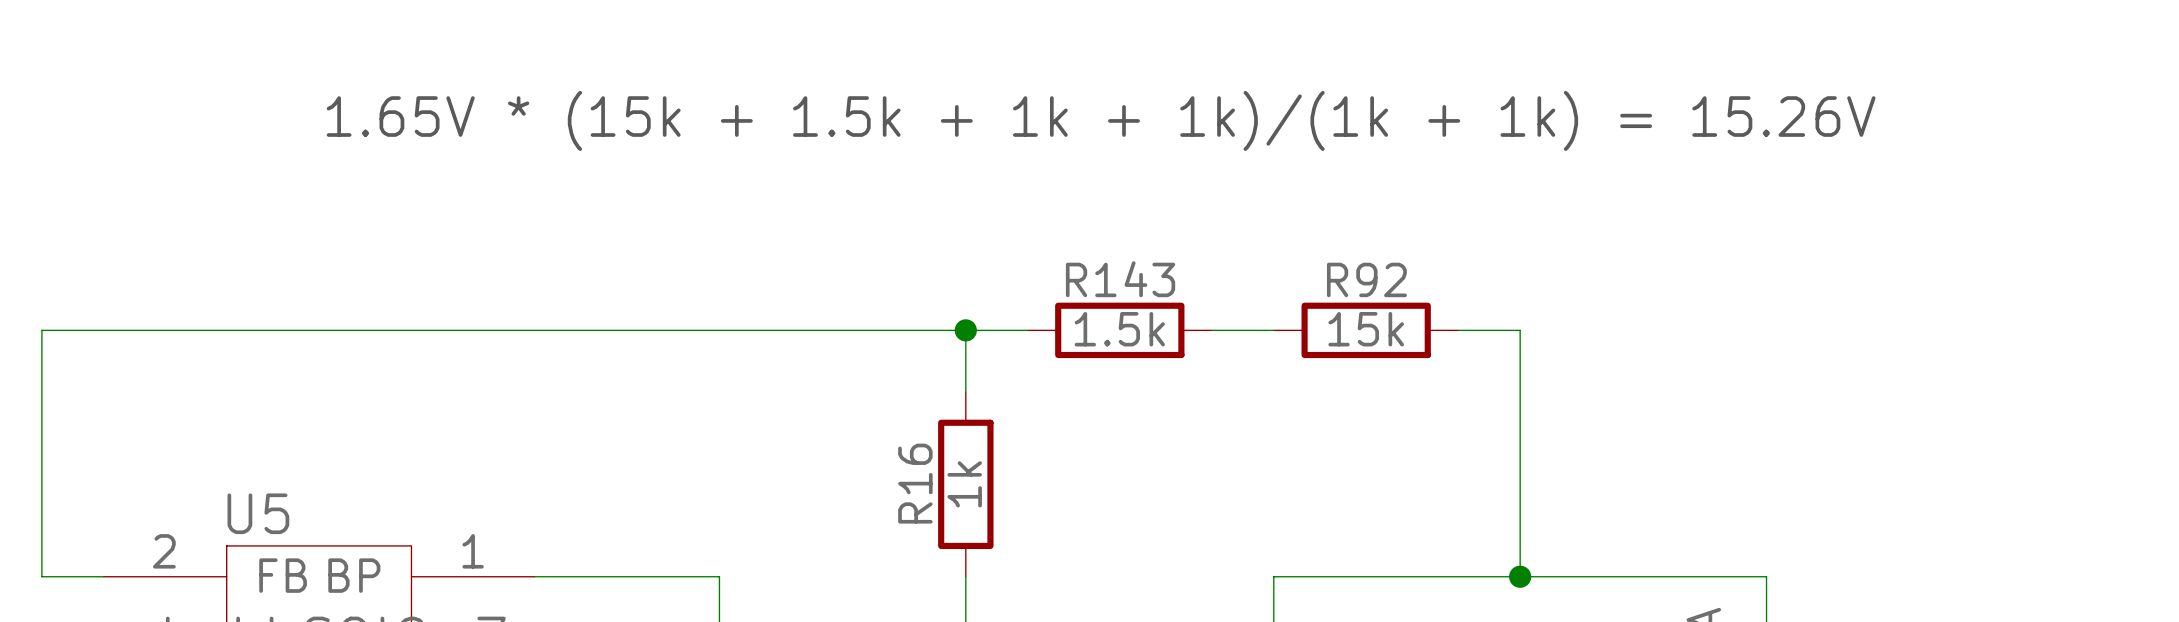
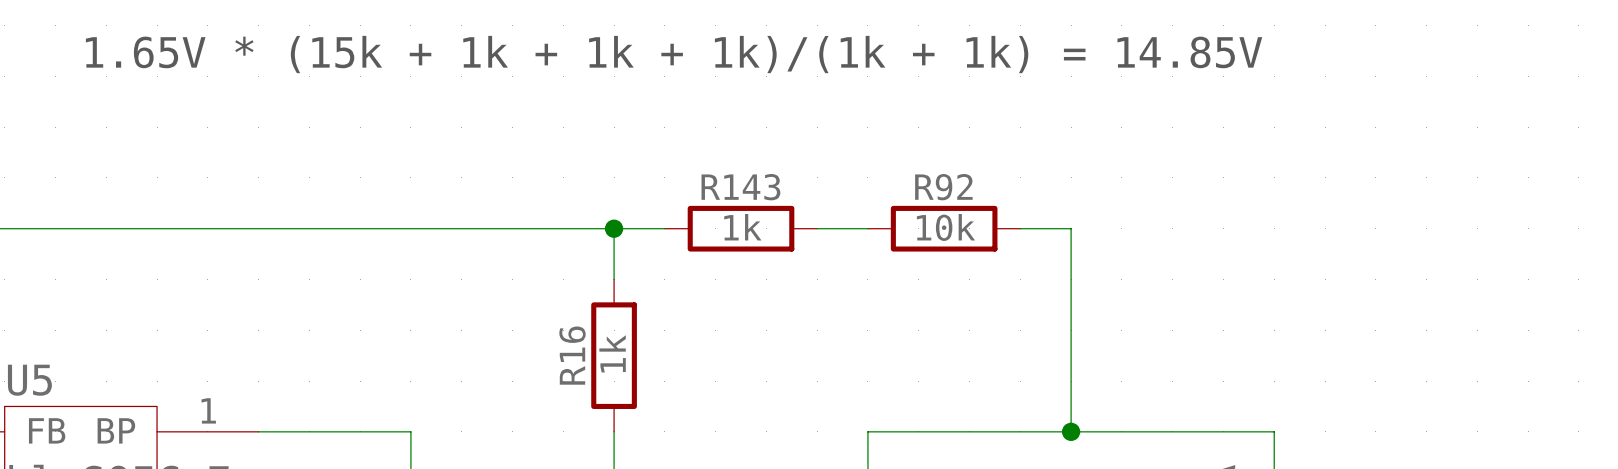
text: 1.65V * (15k + 1.5k + 1k + 1k)/(1k + 1k) = 15.26V (1101, 120) -> 1.65V * (15k + 1k + 1k + 1k)/(1k + 1k) = 14.85V (674, 54)
R143 value: 1.5k (1119, 329) -> 1k (742, 227)
R92 value: 15k (1366, 329) -> 10k (945, 227)

